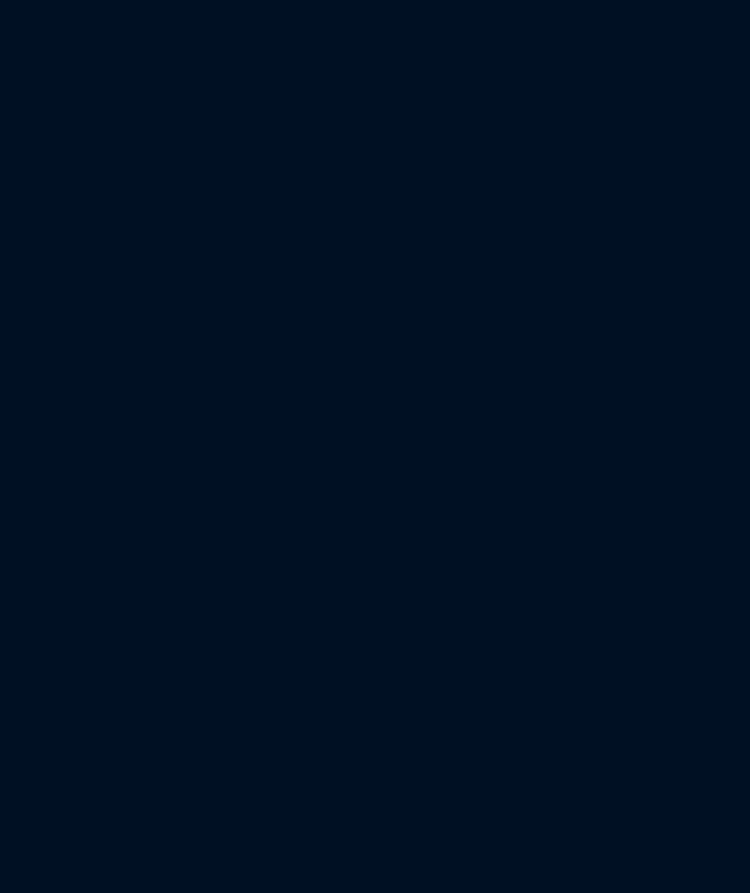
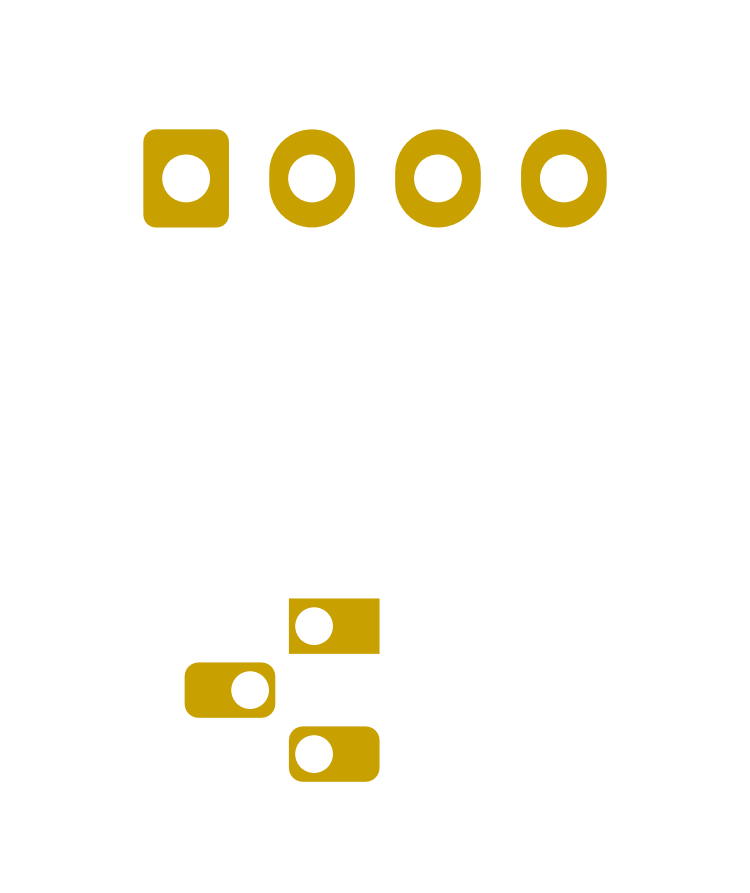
part: none -> (375, 178)
part: none -> (282, 690)

